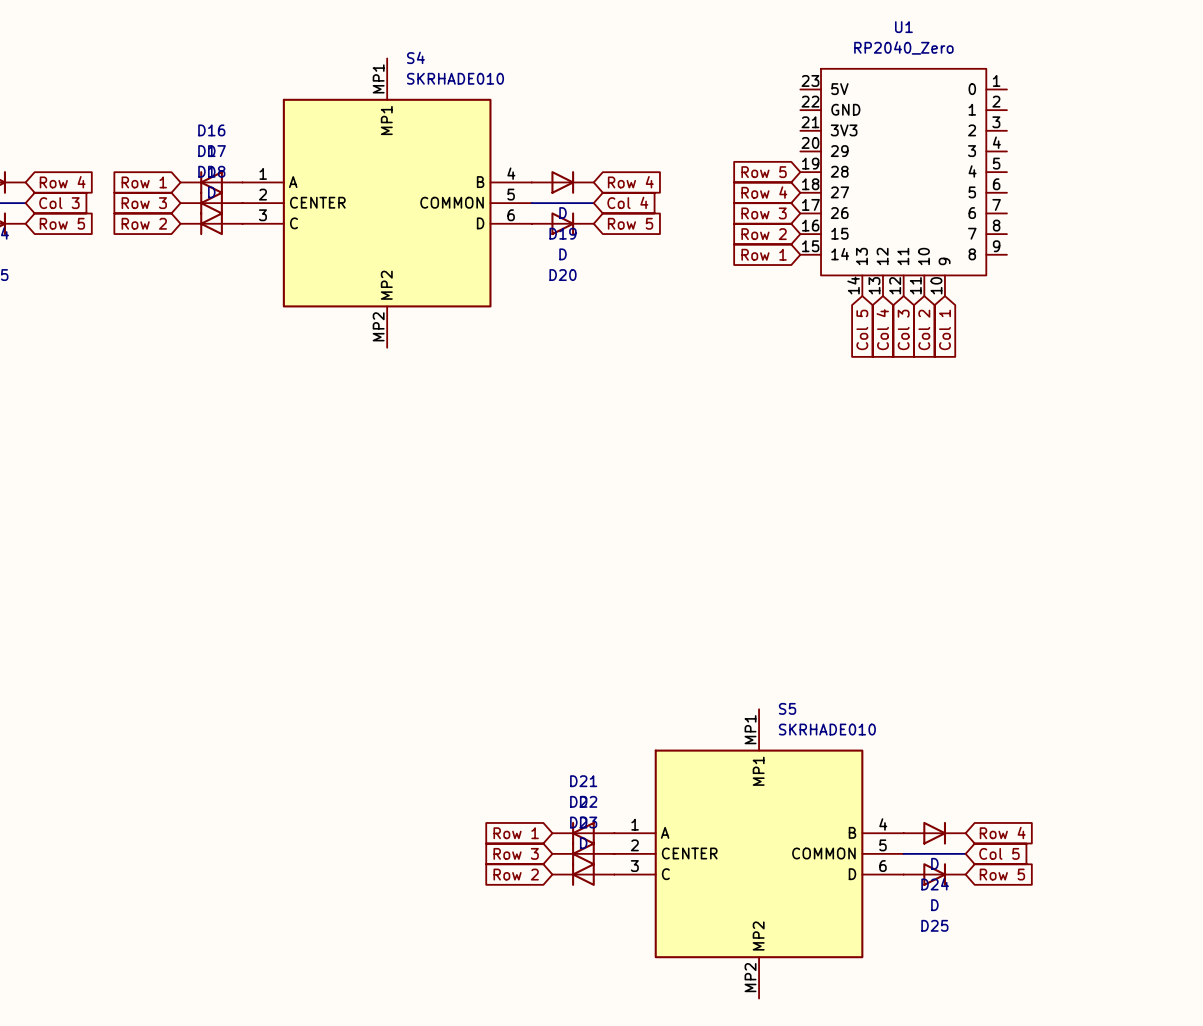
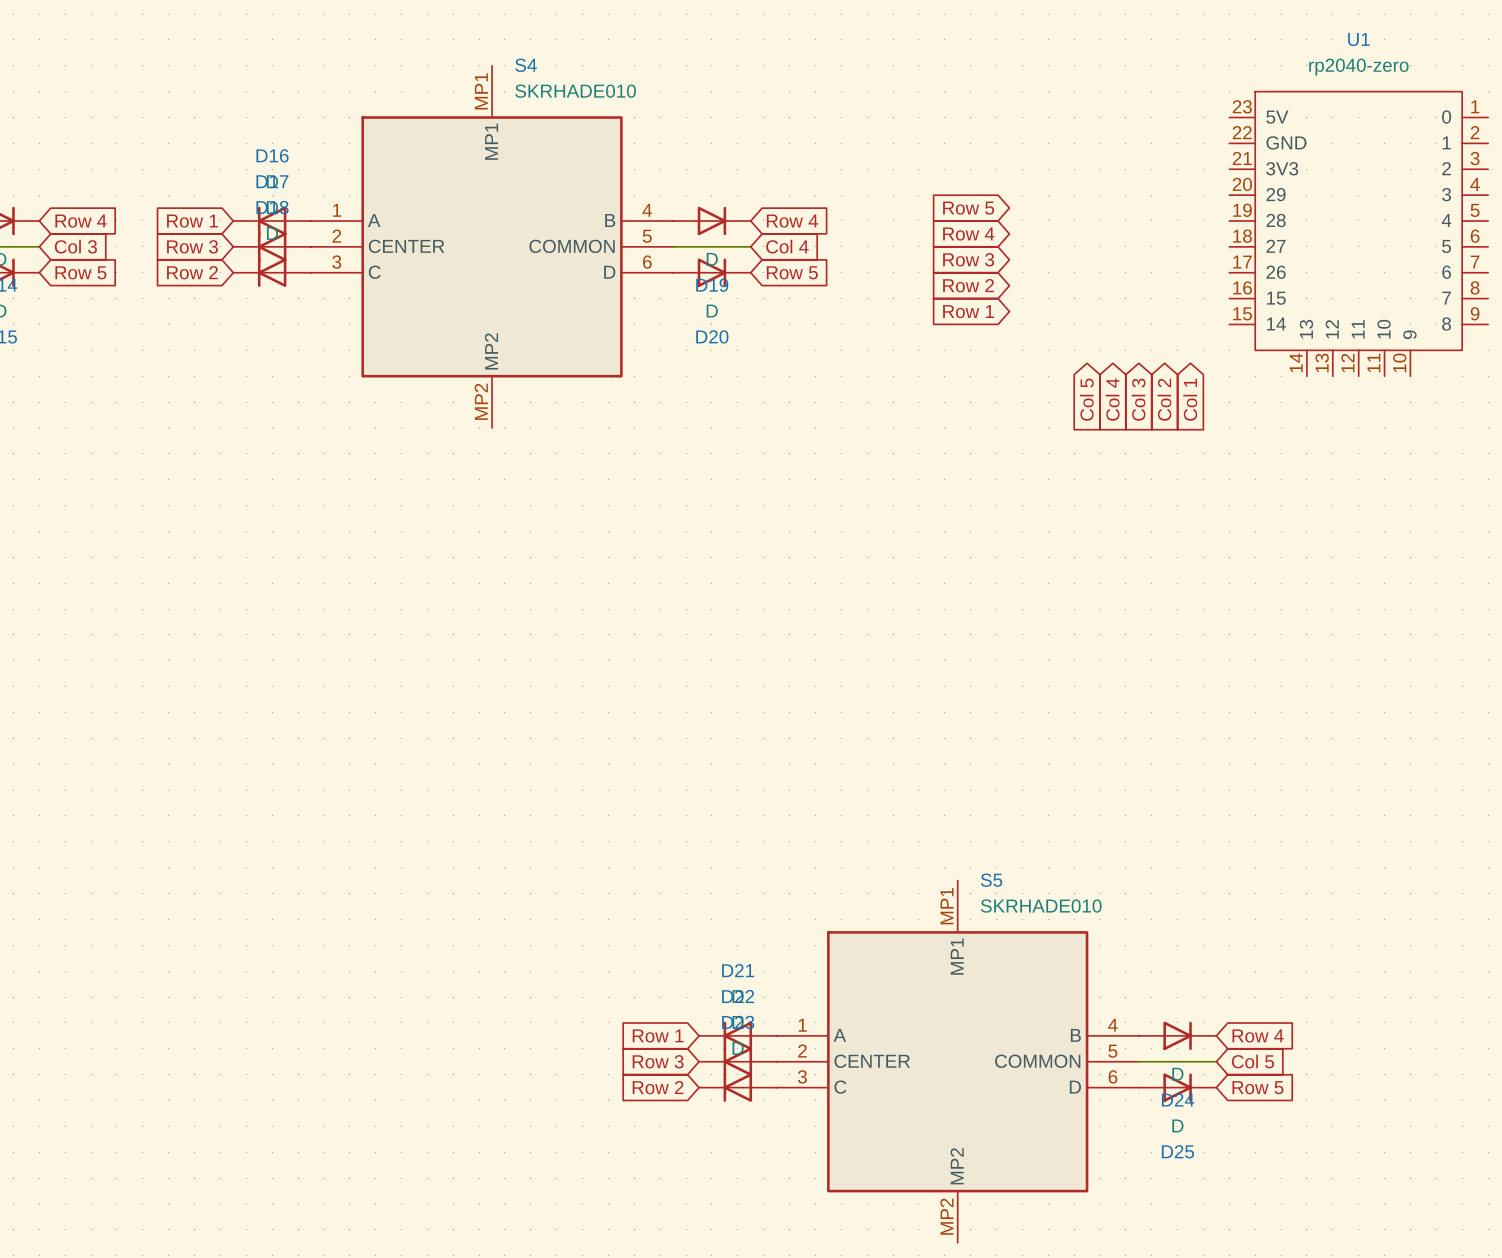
U1 value: RP2040_Zero (903, 48) -> rp2040-zero (1358, 67)
U1 position: (903, 182) -> (1358, 233)

